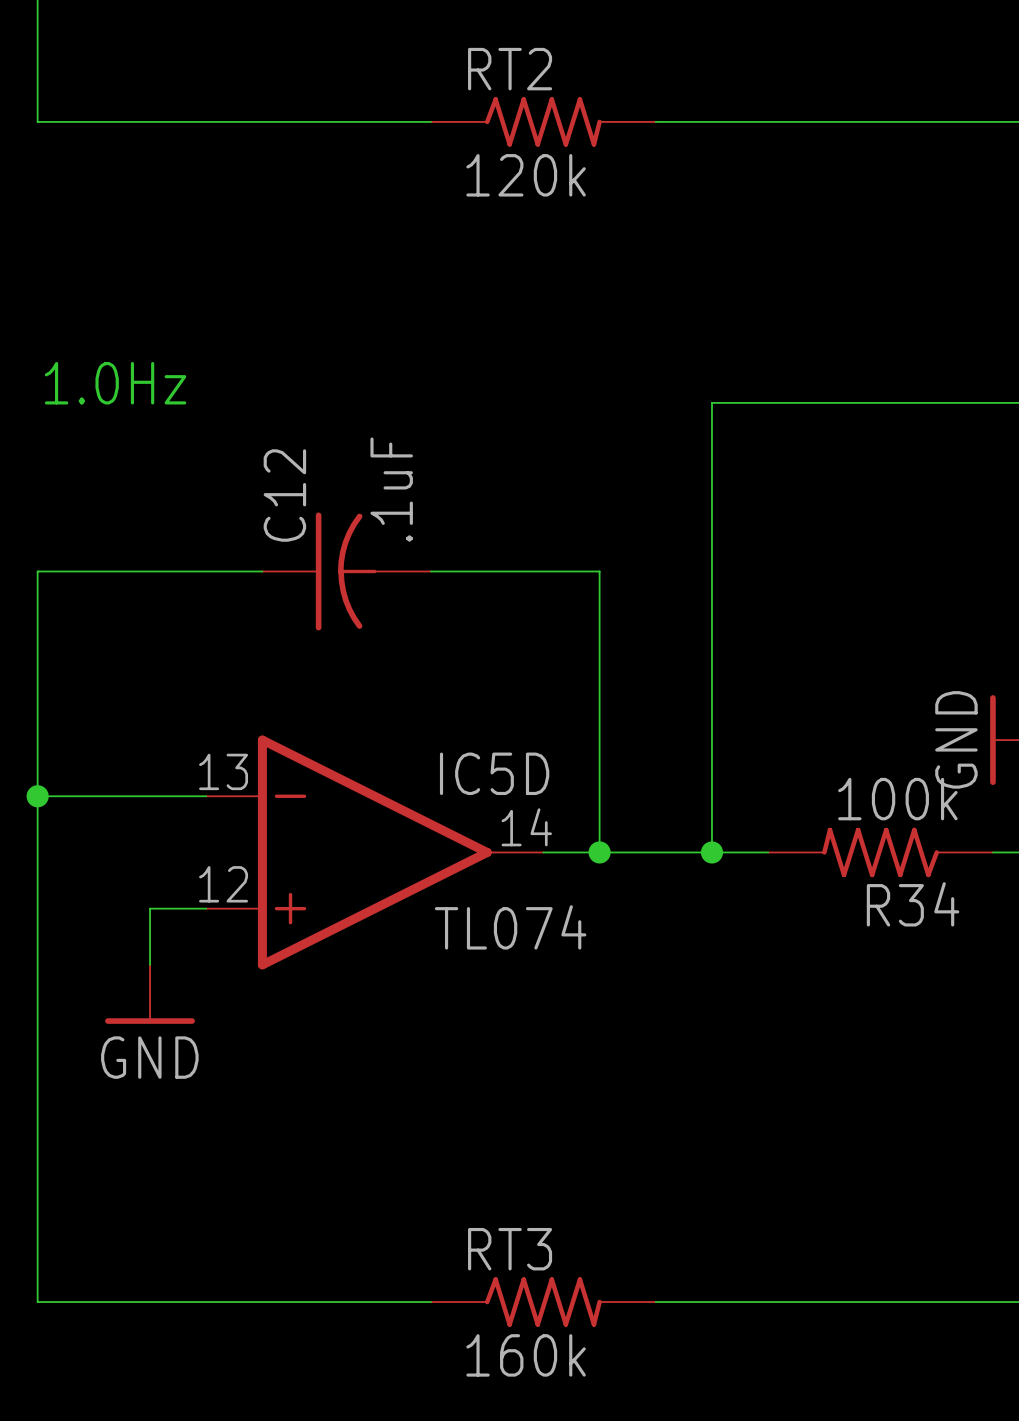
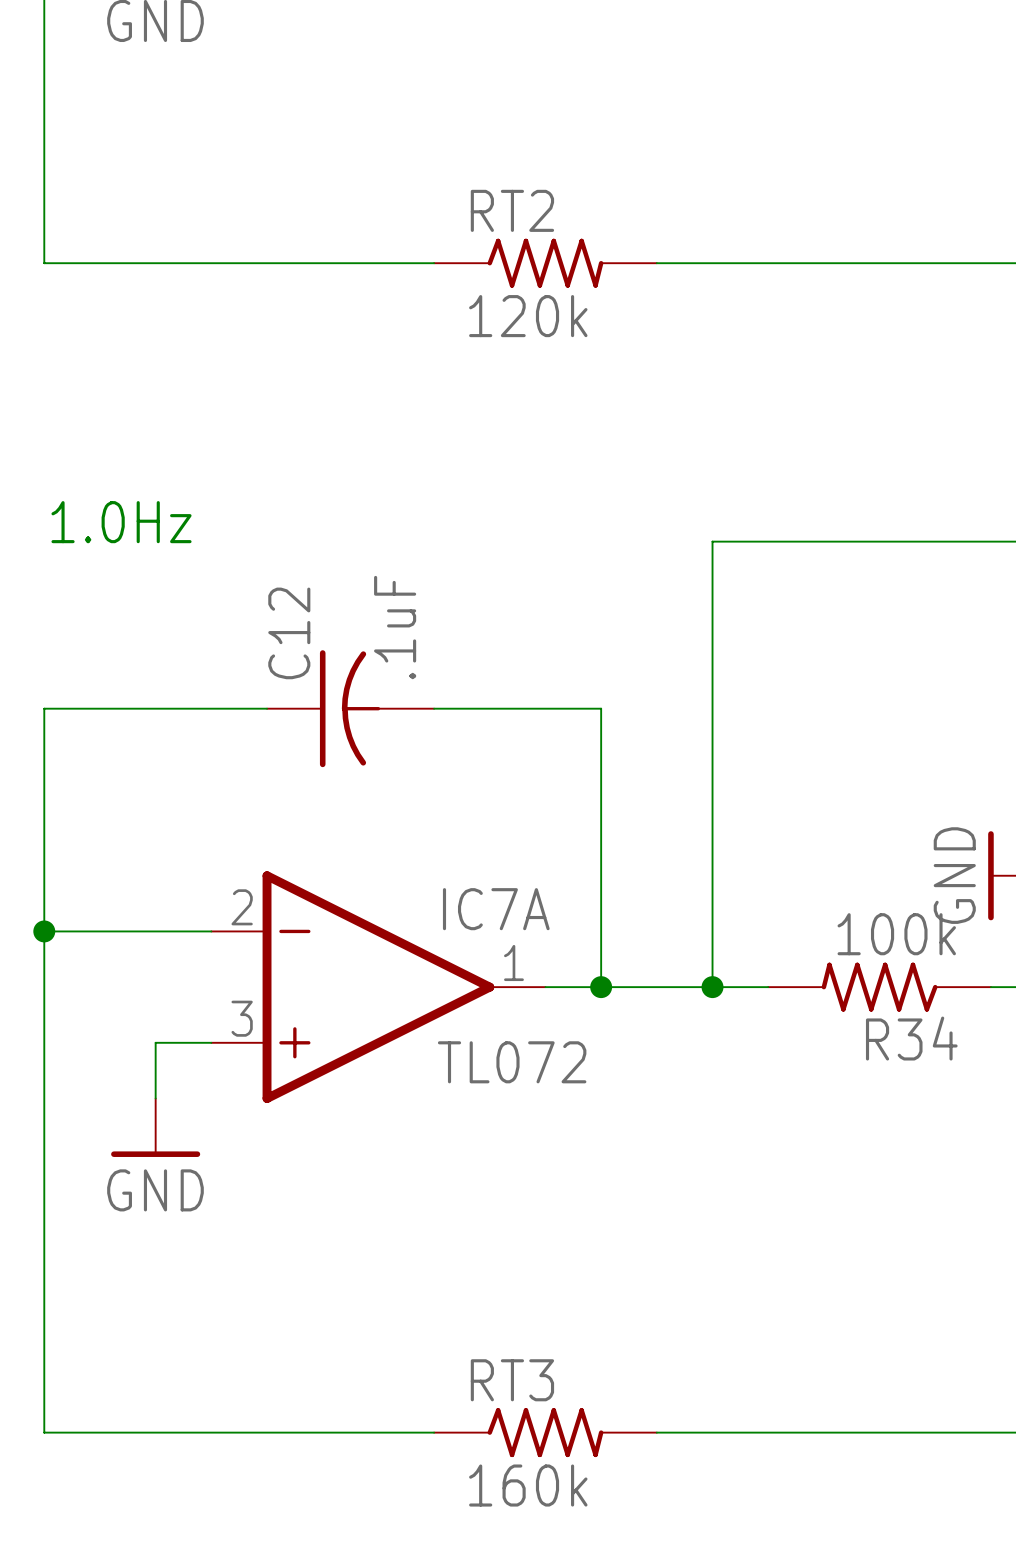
IC5D pin number: 13 (223, 771) -> 2 (242, 907)
IC5D name: IC5D (494, 773) -> IC7A (496, 909)
IC5D pin number: 14 (526, 827) -> 1 (513, 963)
IC5D pin number: 12 (223, 884) -> 3 (242, 1018)
IC5D value: TL074 (510, 927) -> TL072 (512, 1062)

